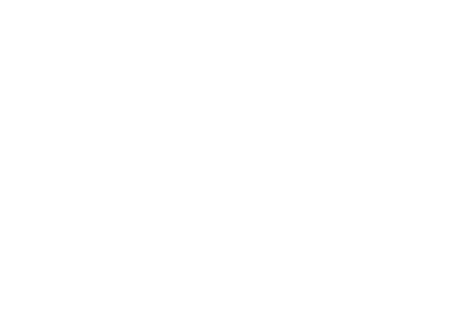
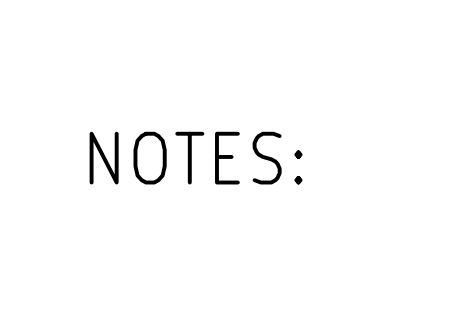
text: none -> NOTES: (196, 158)

